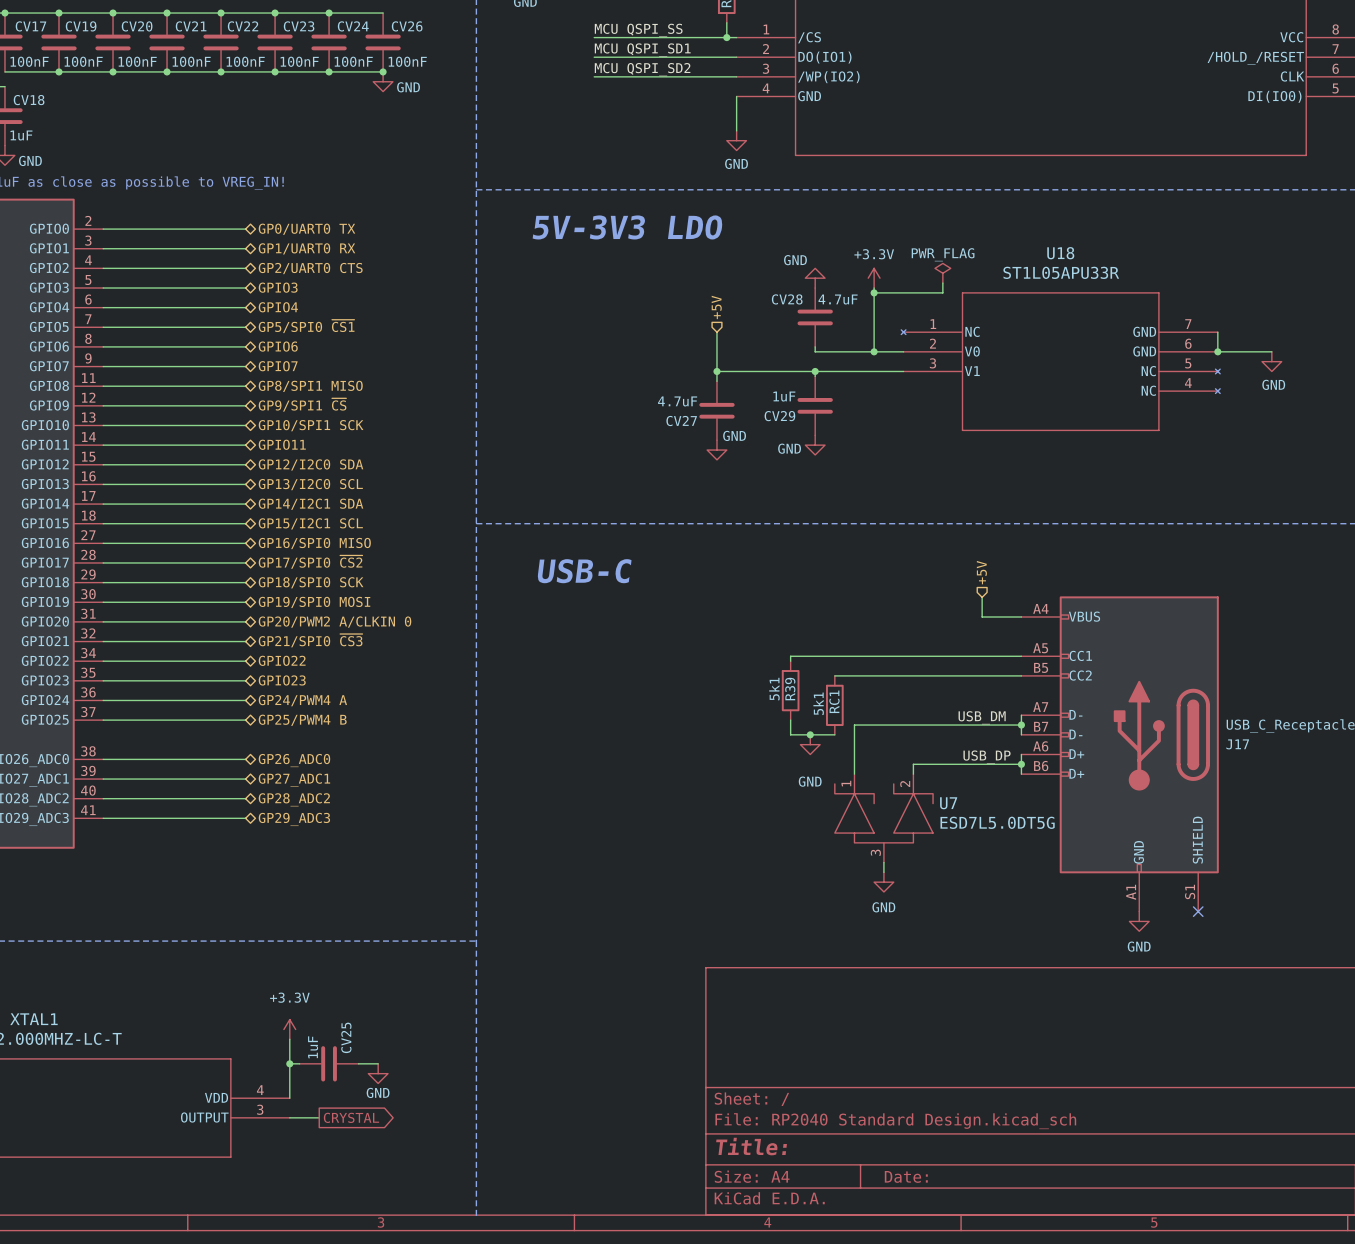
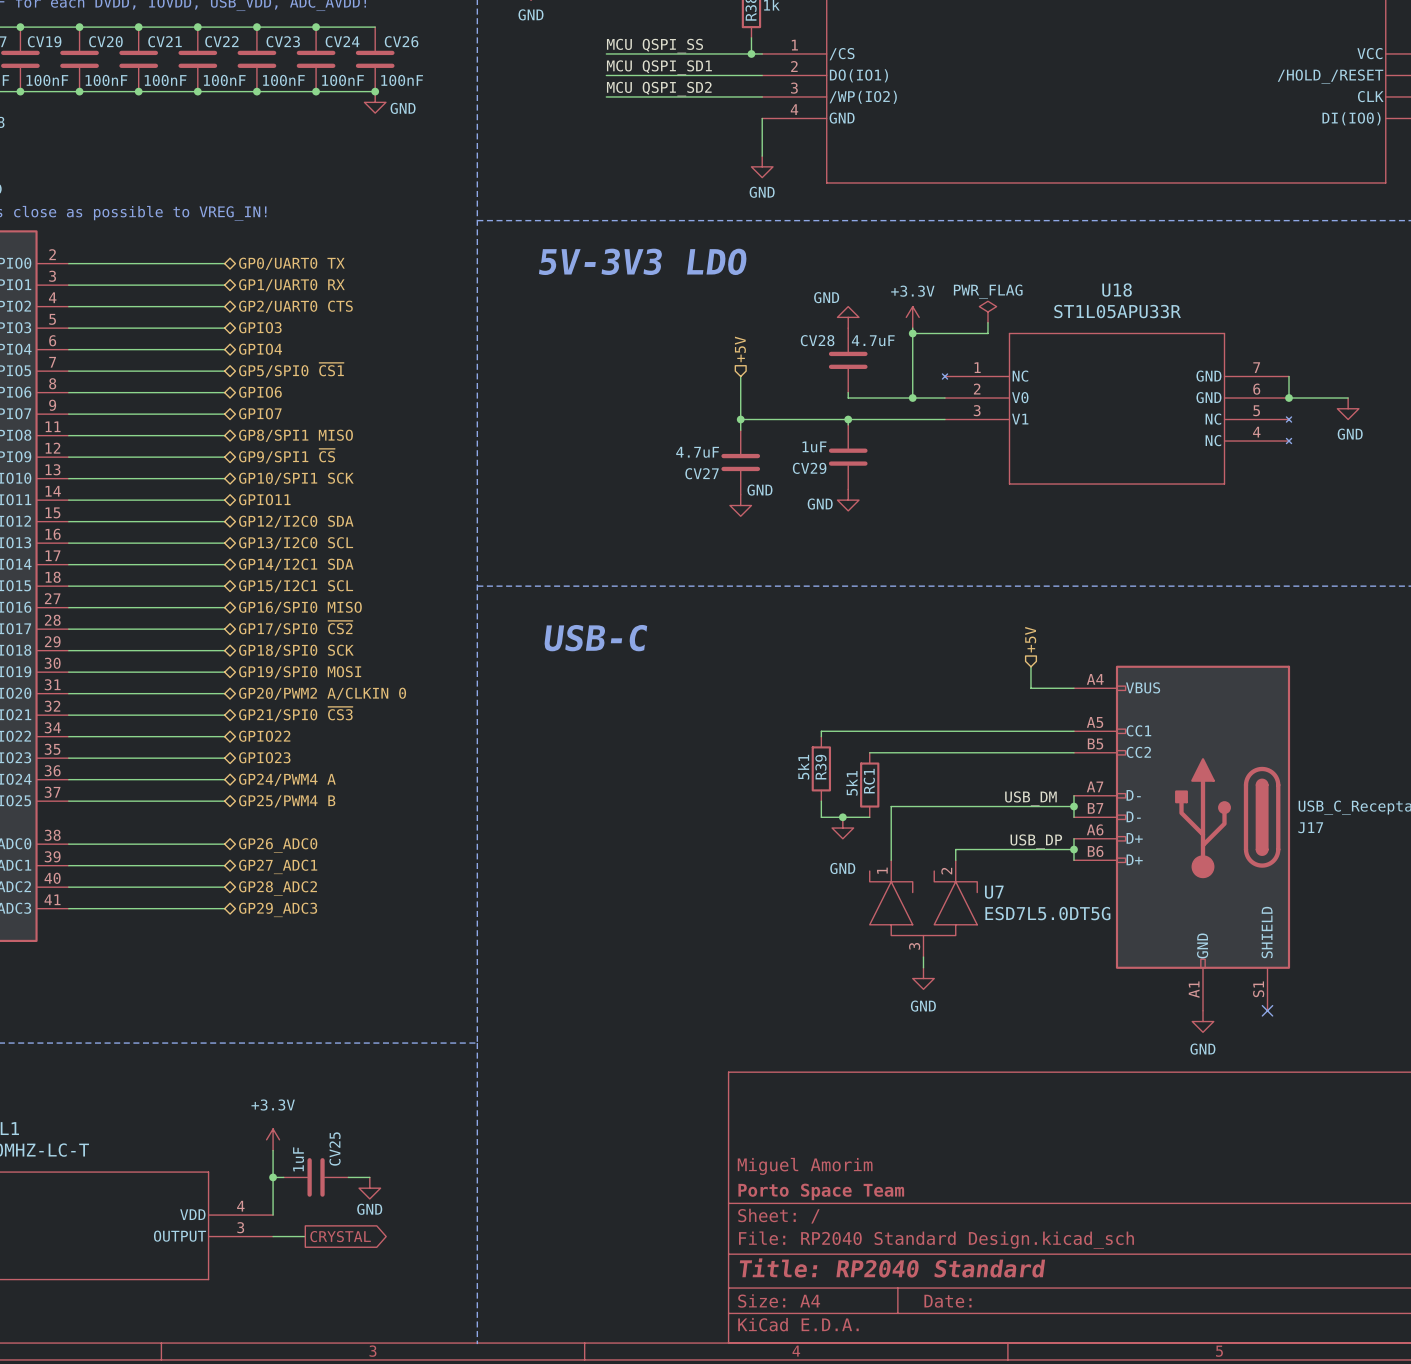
title block: none -> Miguel Amorim (805, 1166)
title block: none -> Porto Space Team (821, 1191)
title block: Title: (751, 1146) -> Title: RP2040 Standard (892, 1267)

